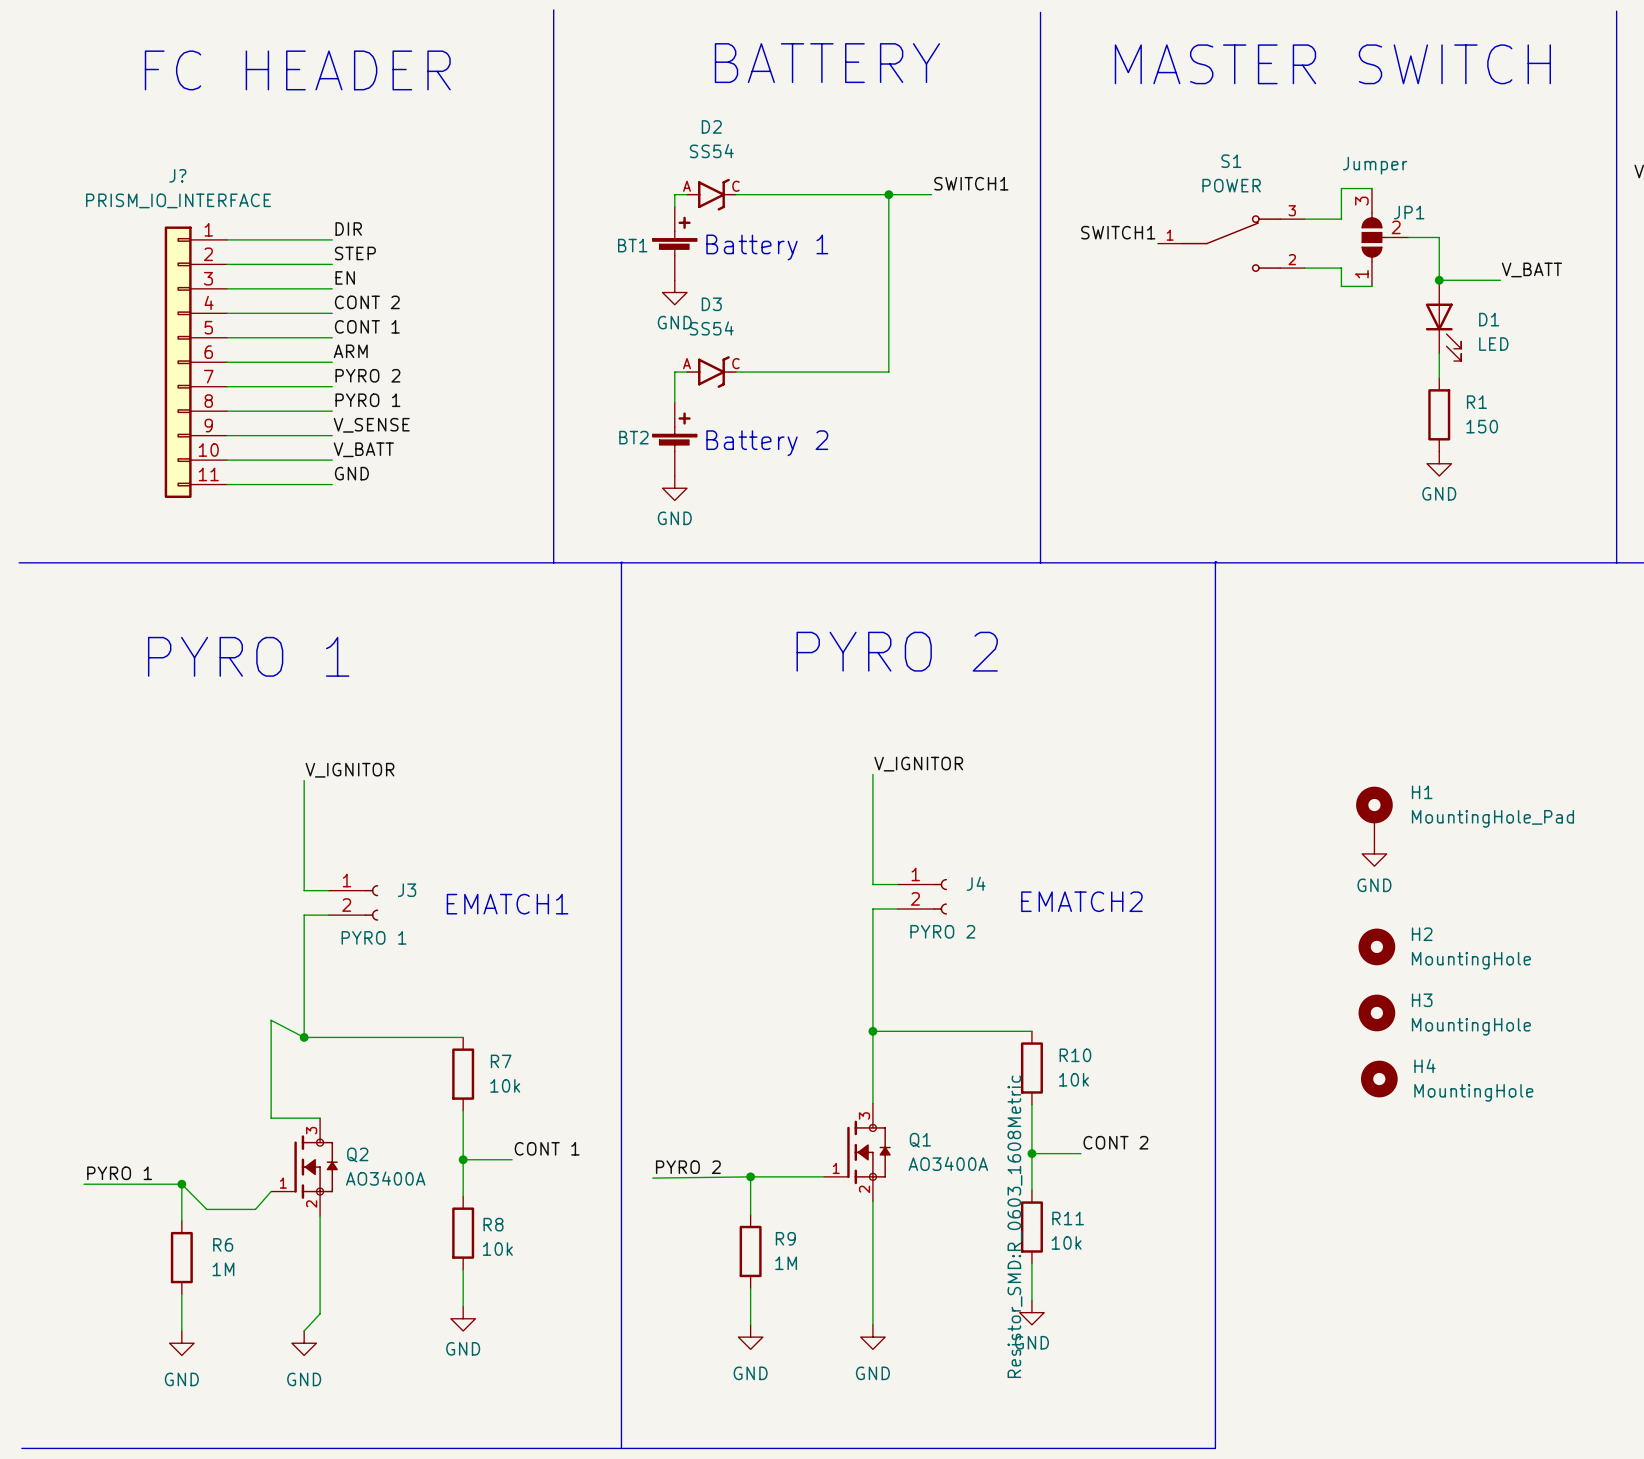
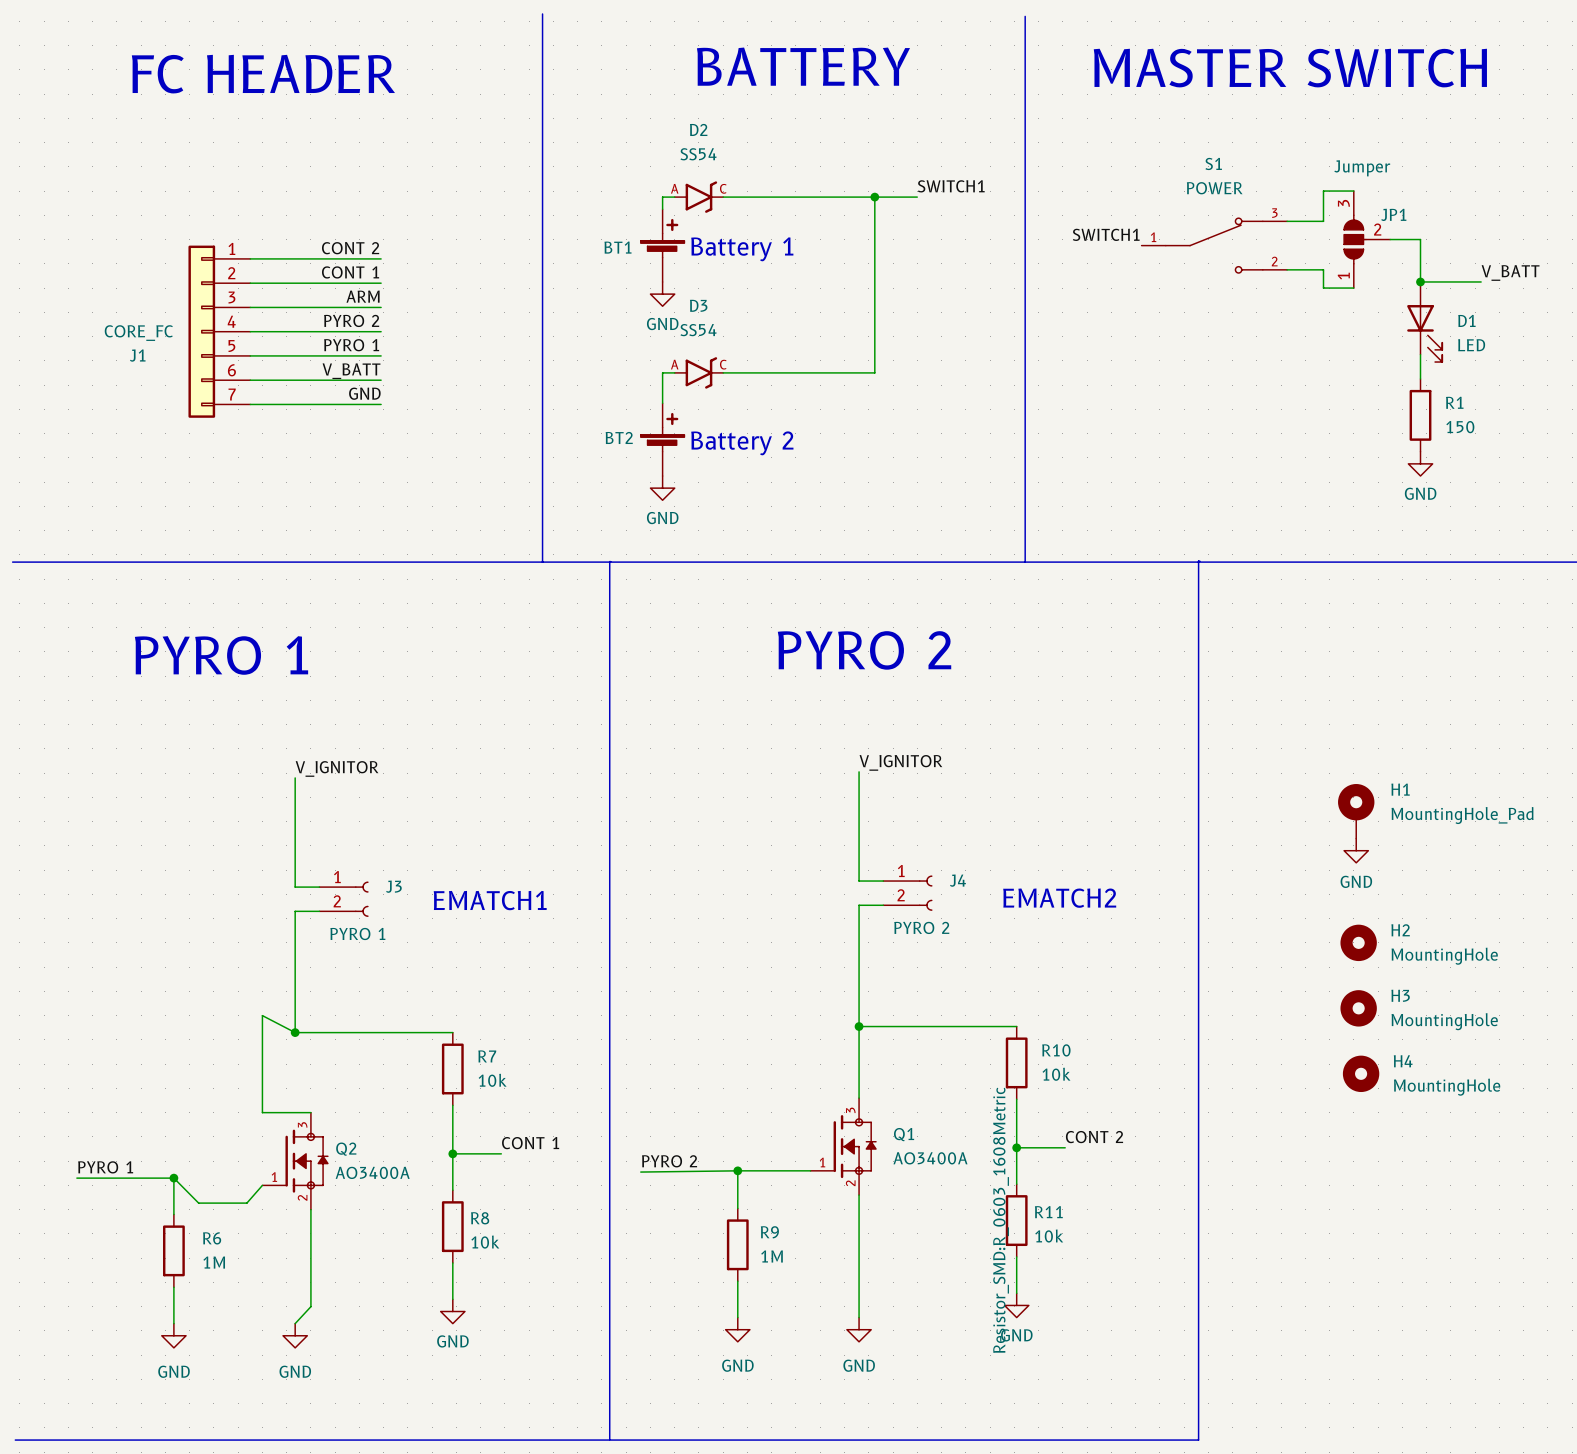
label: DIR (348, 229) -> none
wire: (227, 239) (332, 239) -> none
label: STEP (355, 253) -> none
wire: none -> (250, 258) (381, 258)
wire: (227, 264) (332, 264) -> none
label: EN (345, 277) -> none
wire: none -> (250, 283) (381, 283)
wire: (227, 288) (332, 288) -> none
label position: CONT 2 (367, 302) -> CONT 2 (350, 248)
wire: none -> (250, 307) (381, 307)
wire: (227, 313) (332, 313) -> none
label position: CONT 1 (367, 326) -> CONT 1 (350, 272)
J1: none -> CORE_FC (219, 331)
wire: none -> (250, 331) (381, 331)
wire: (227, 337) (332, 337) -> none
label position: ARM (350, 351) -> ARM (363, 296)
wire: none -> (250, 355) (381, 355)
J?: PRISM_IO_INTERFACE (195, 362) -> none
wire: (227, 362) (332, 362) -> none
label position: PYRO 2 (367, 375) -> PYRO 2 (351, 320)
wire: none -> (250, 380) (381, 380)
wire: (227, 386) (332, 386) -> none
label position: PYRO 1 (367, 400) -> PYRO 1 (351, 345)
wire: none -> (250, 404) (381, 404)
wire: (227, 411) (332, 411) -> none
label: V_SENSE (371, 425) -> none
wire: (227, 435) (332, 435) -> none
label position: V_BATT (363, 449) -> V_BATT (351, 371)
wire: (227, 460) (332, 460) -> none
label position: GND (351, 473) -> GND (364, 393)
wire: (227, 484) (332, 484) -> none

